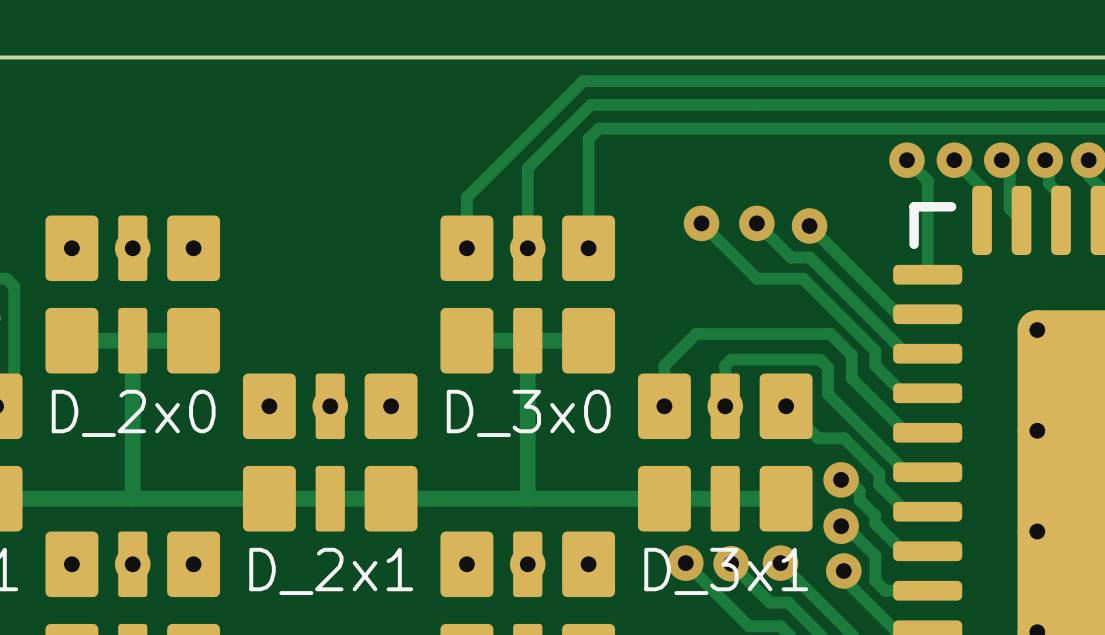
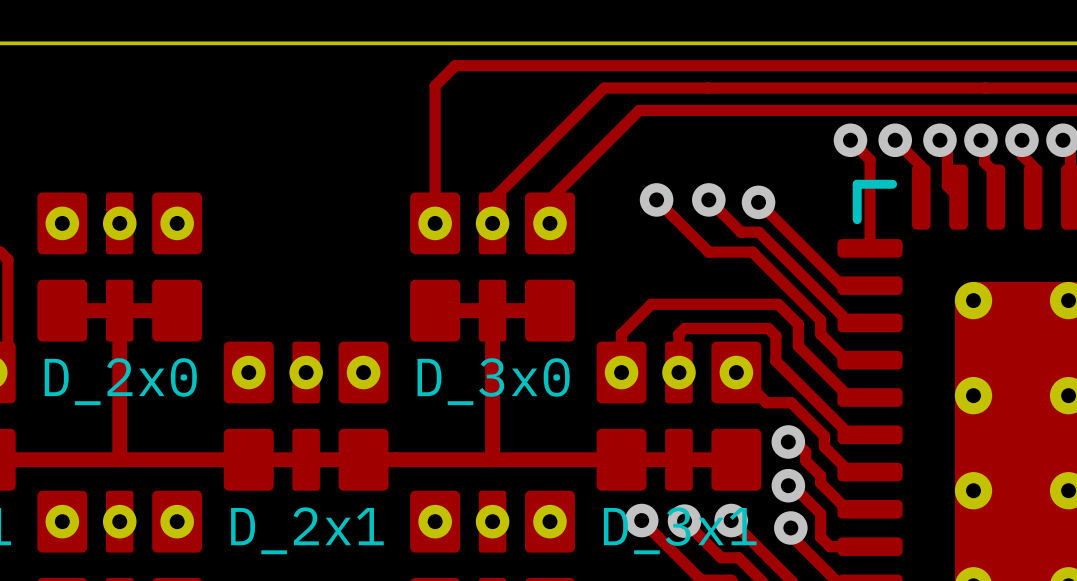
track: (583, 81) (466, 197) -> (544, 65) (455, 65) (435, 85) (435, 175)
track: (646, 104) (590, 104) (527, 168) (527, 223) -> (604, 88) (492, 199)
track: (683, 128) (598, 128) (588, 138) (588, 223) -> (639, 110) (549, 199)

